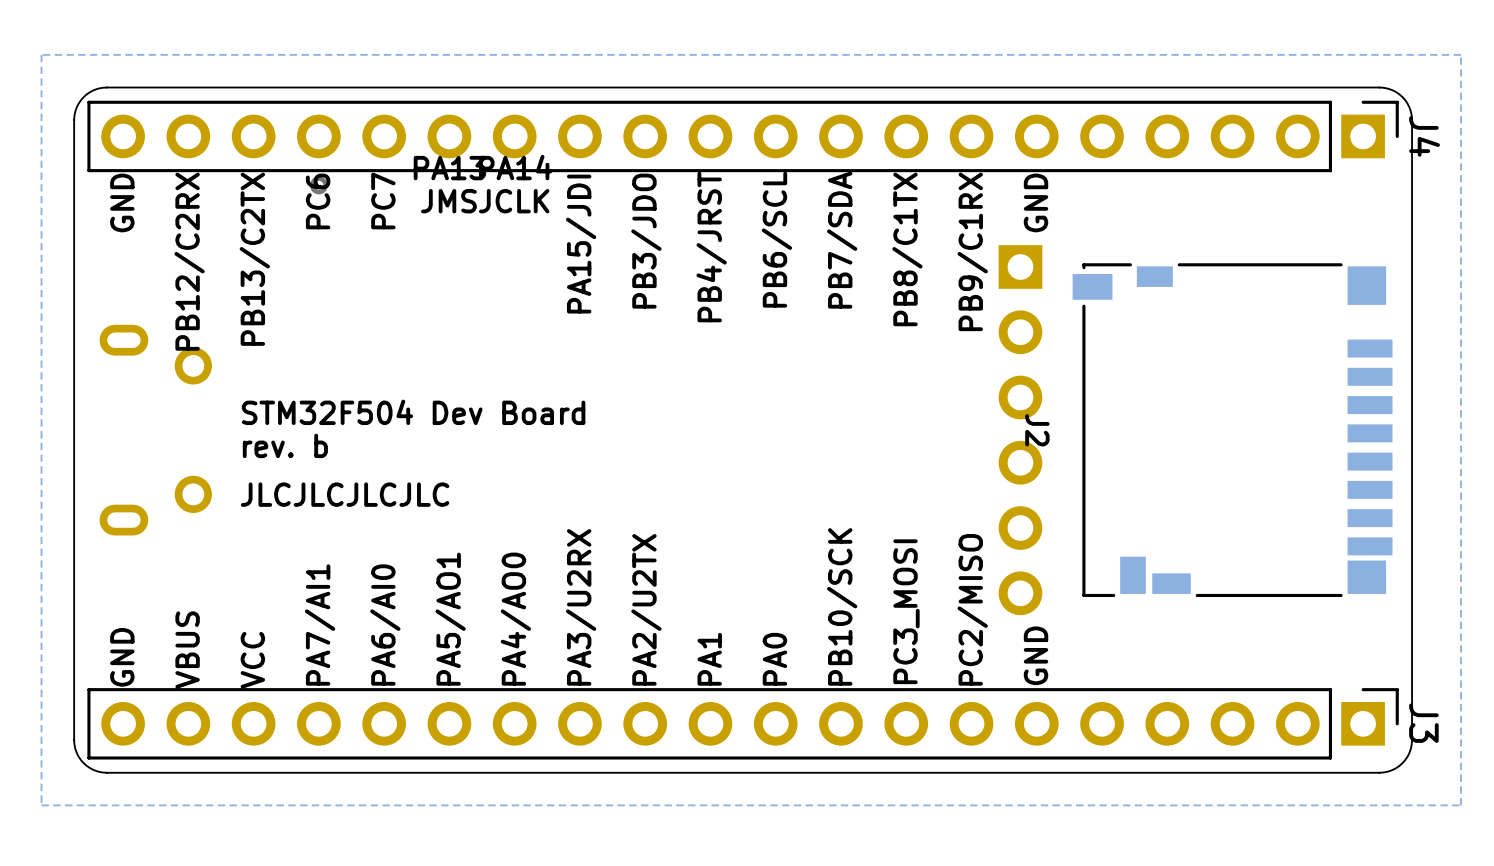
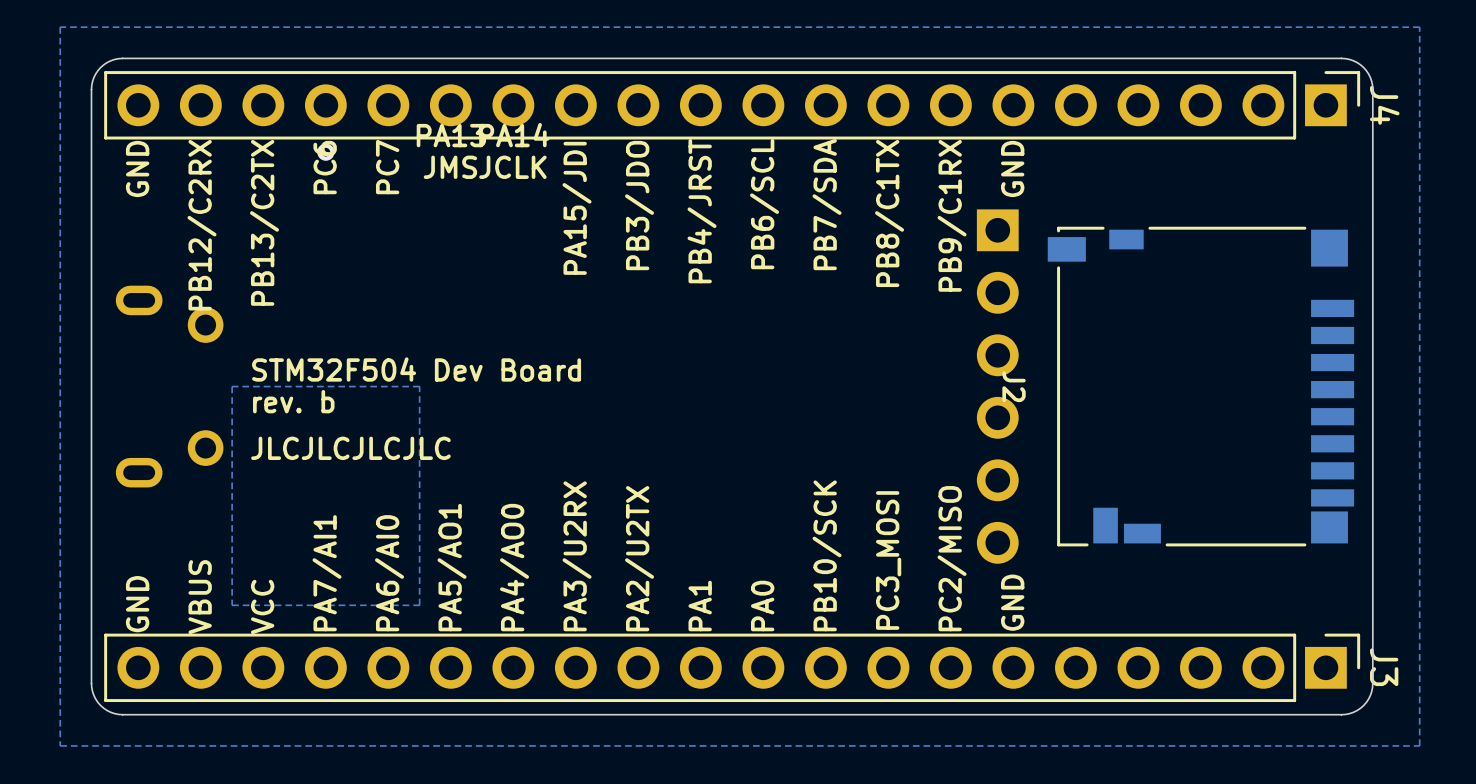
zone outline: none -> (419, 386) (419, 605) (232, 605) (232, 386) (419, 386)

